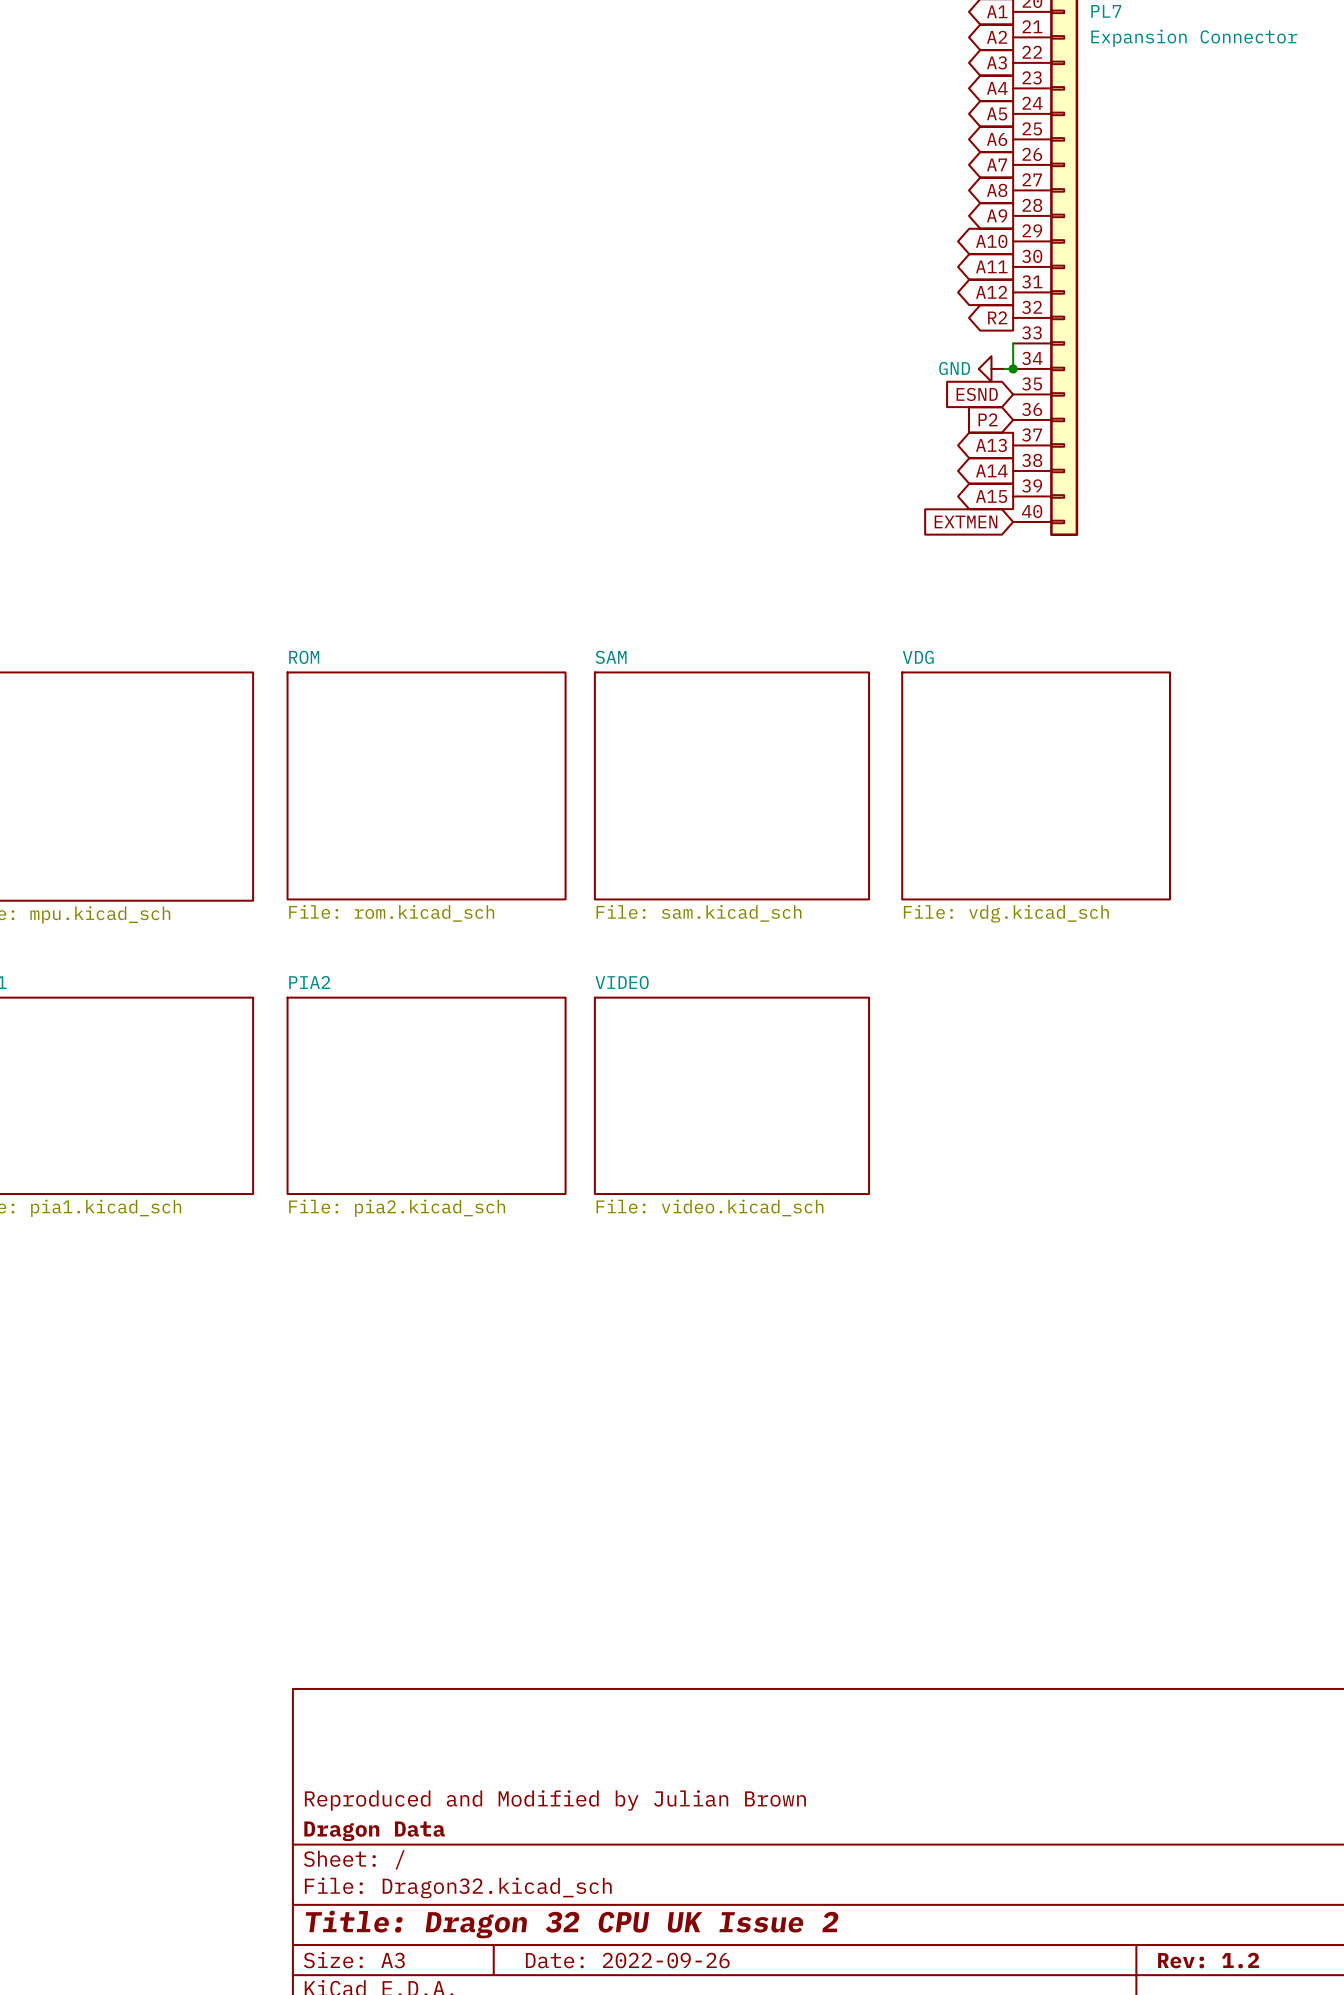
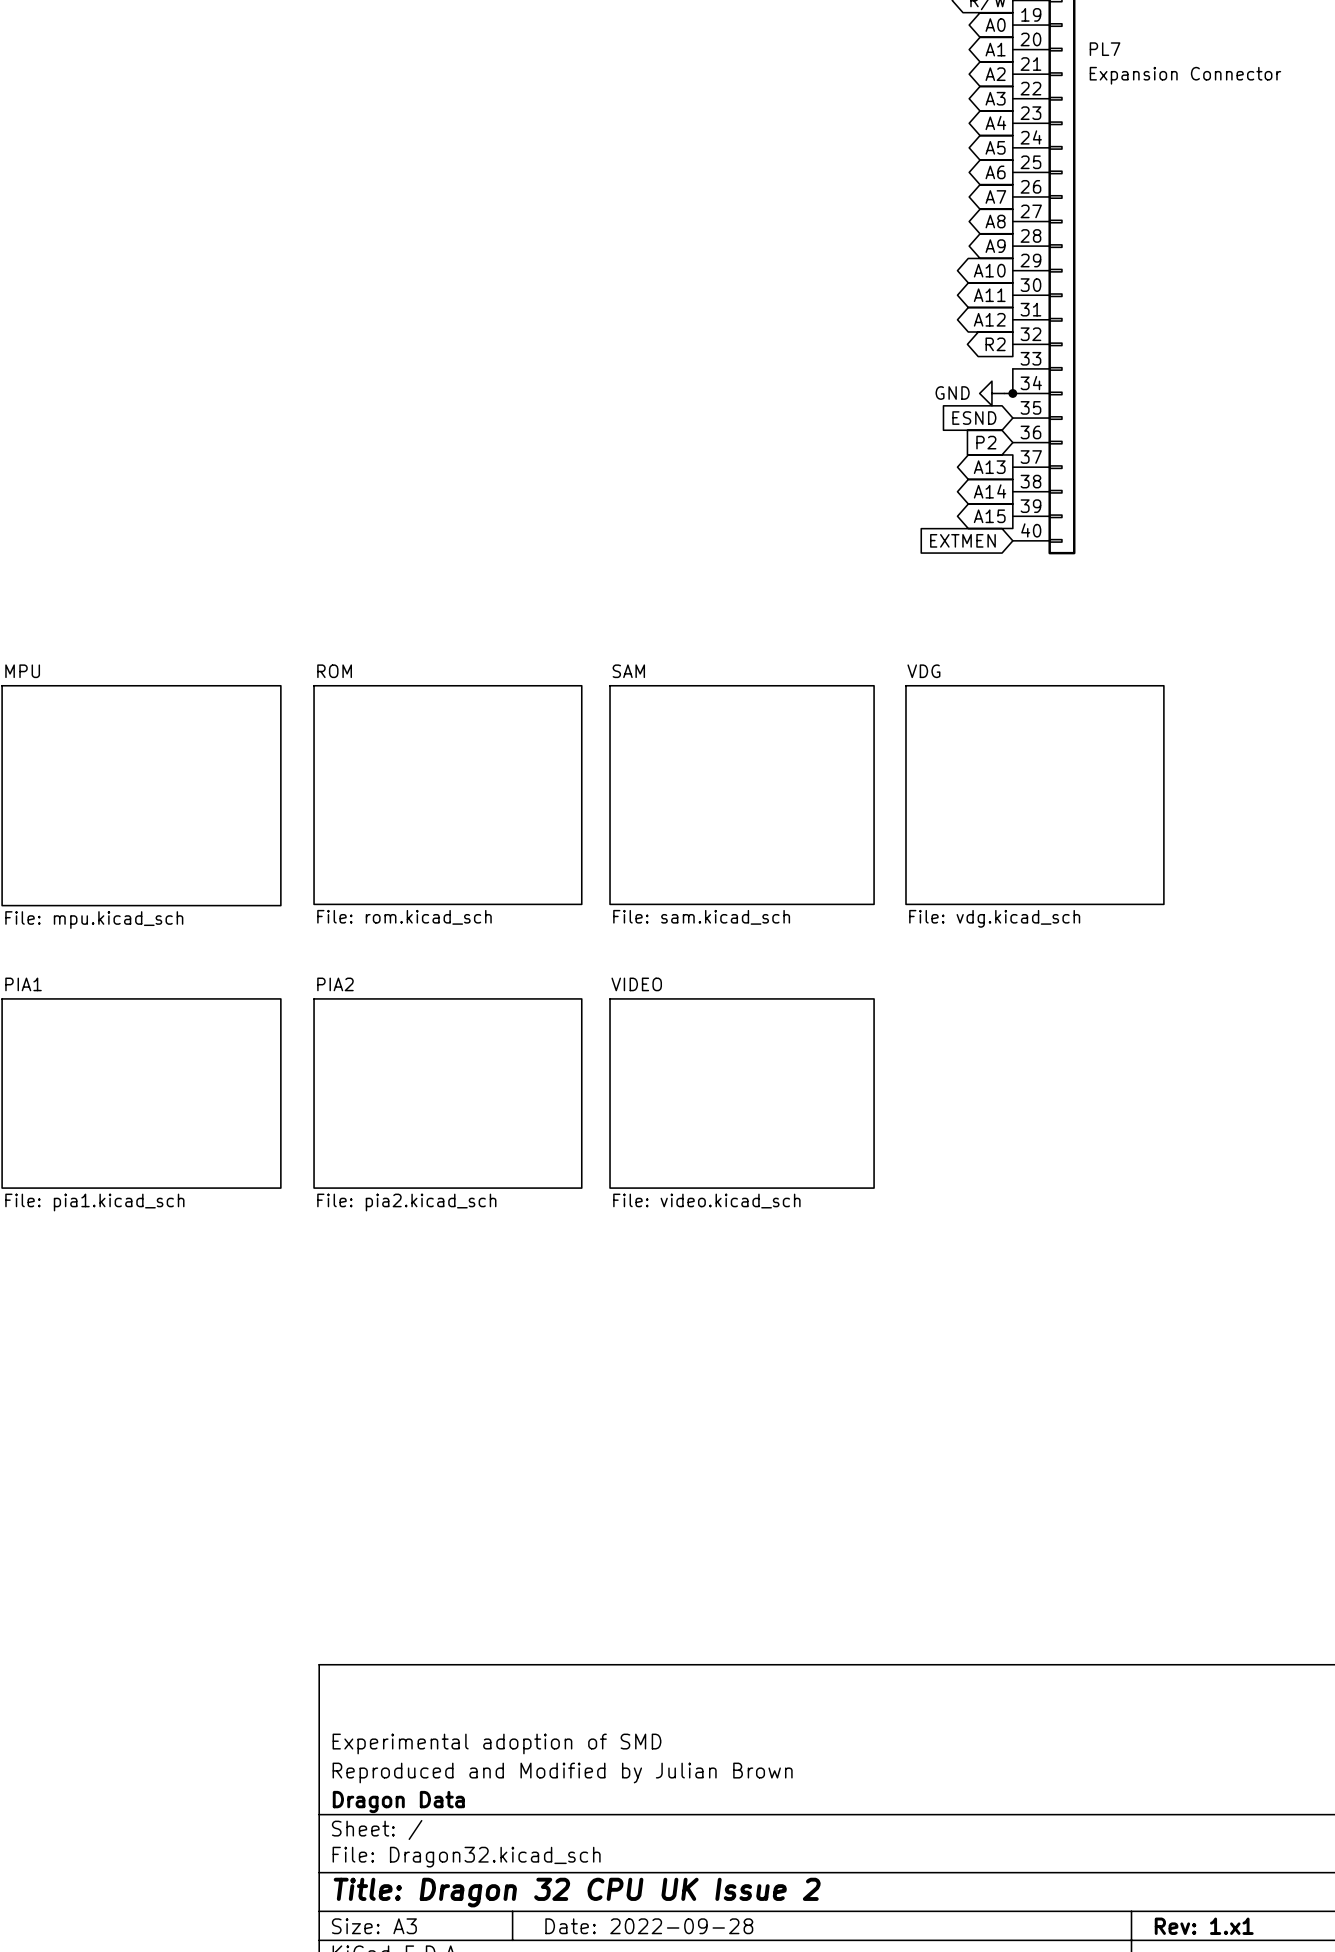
title block: none -> Experimental adoption of SMD (496, 1743)
title block: Date: 2022-09-26 (627, 1960) -> Date: 2022-09-28 (649, 1926)
title block: Rev: 1.2 (1208, 1960) -> Rev: 1.x1 (1204, 1926)

